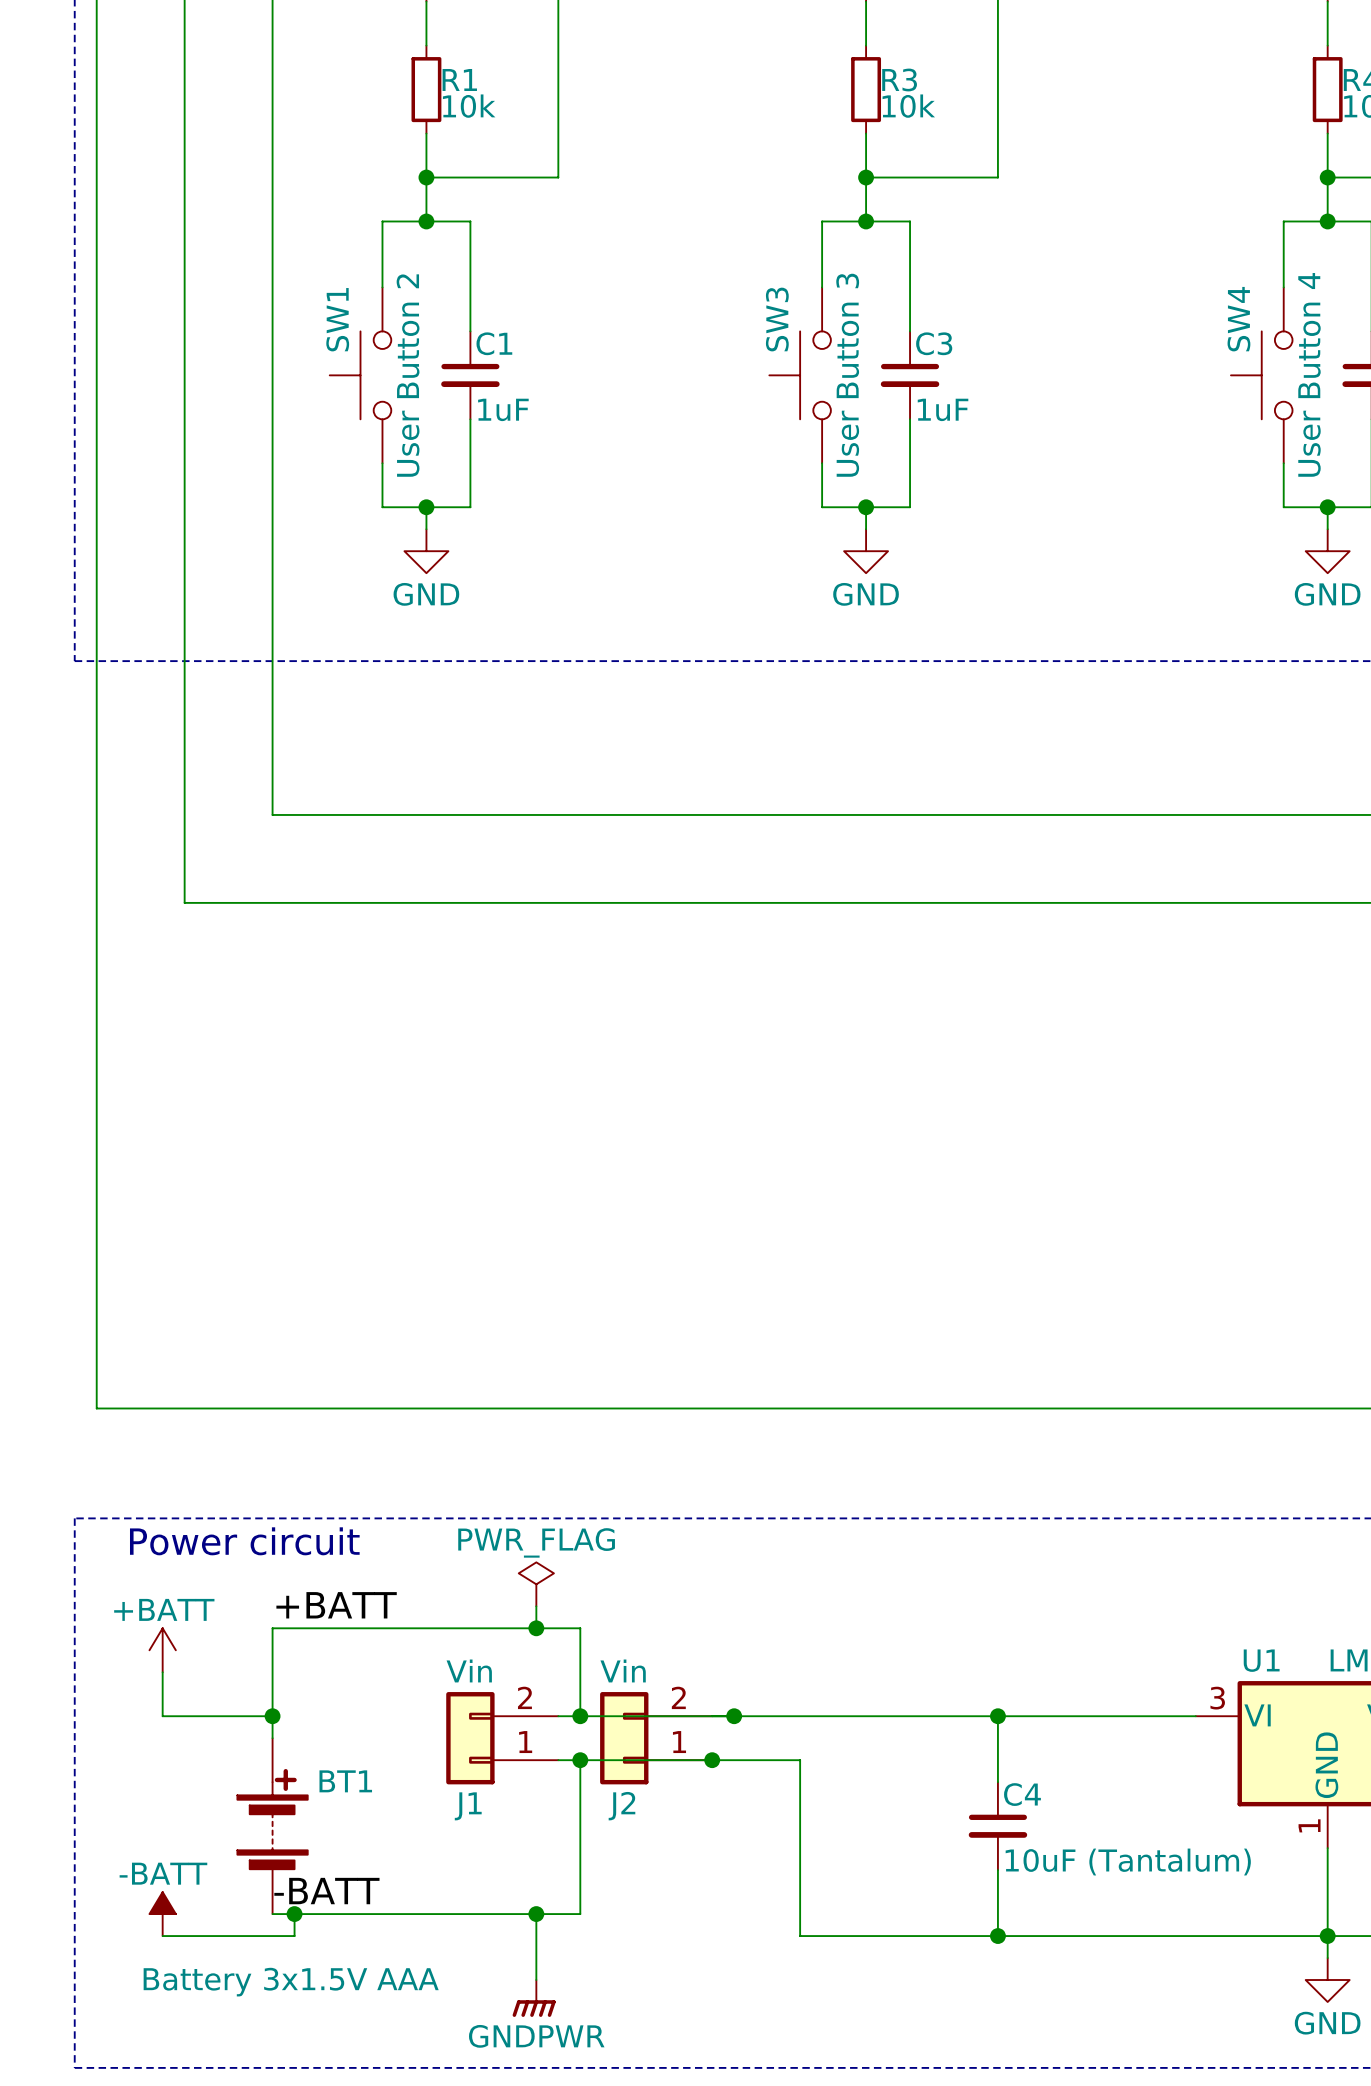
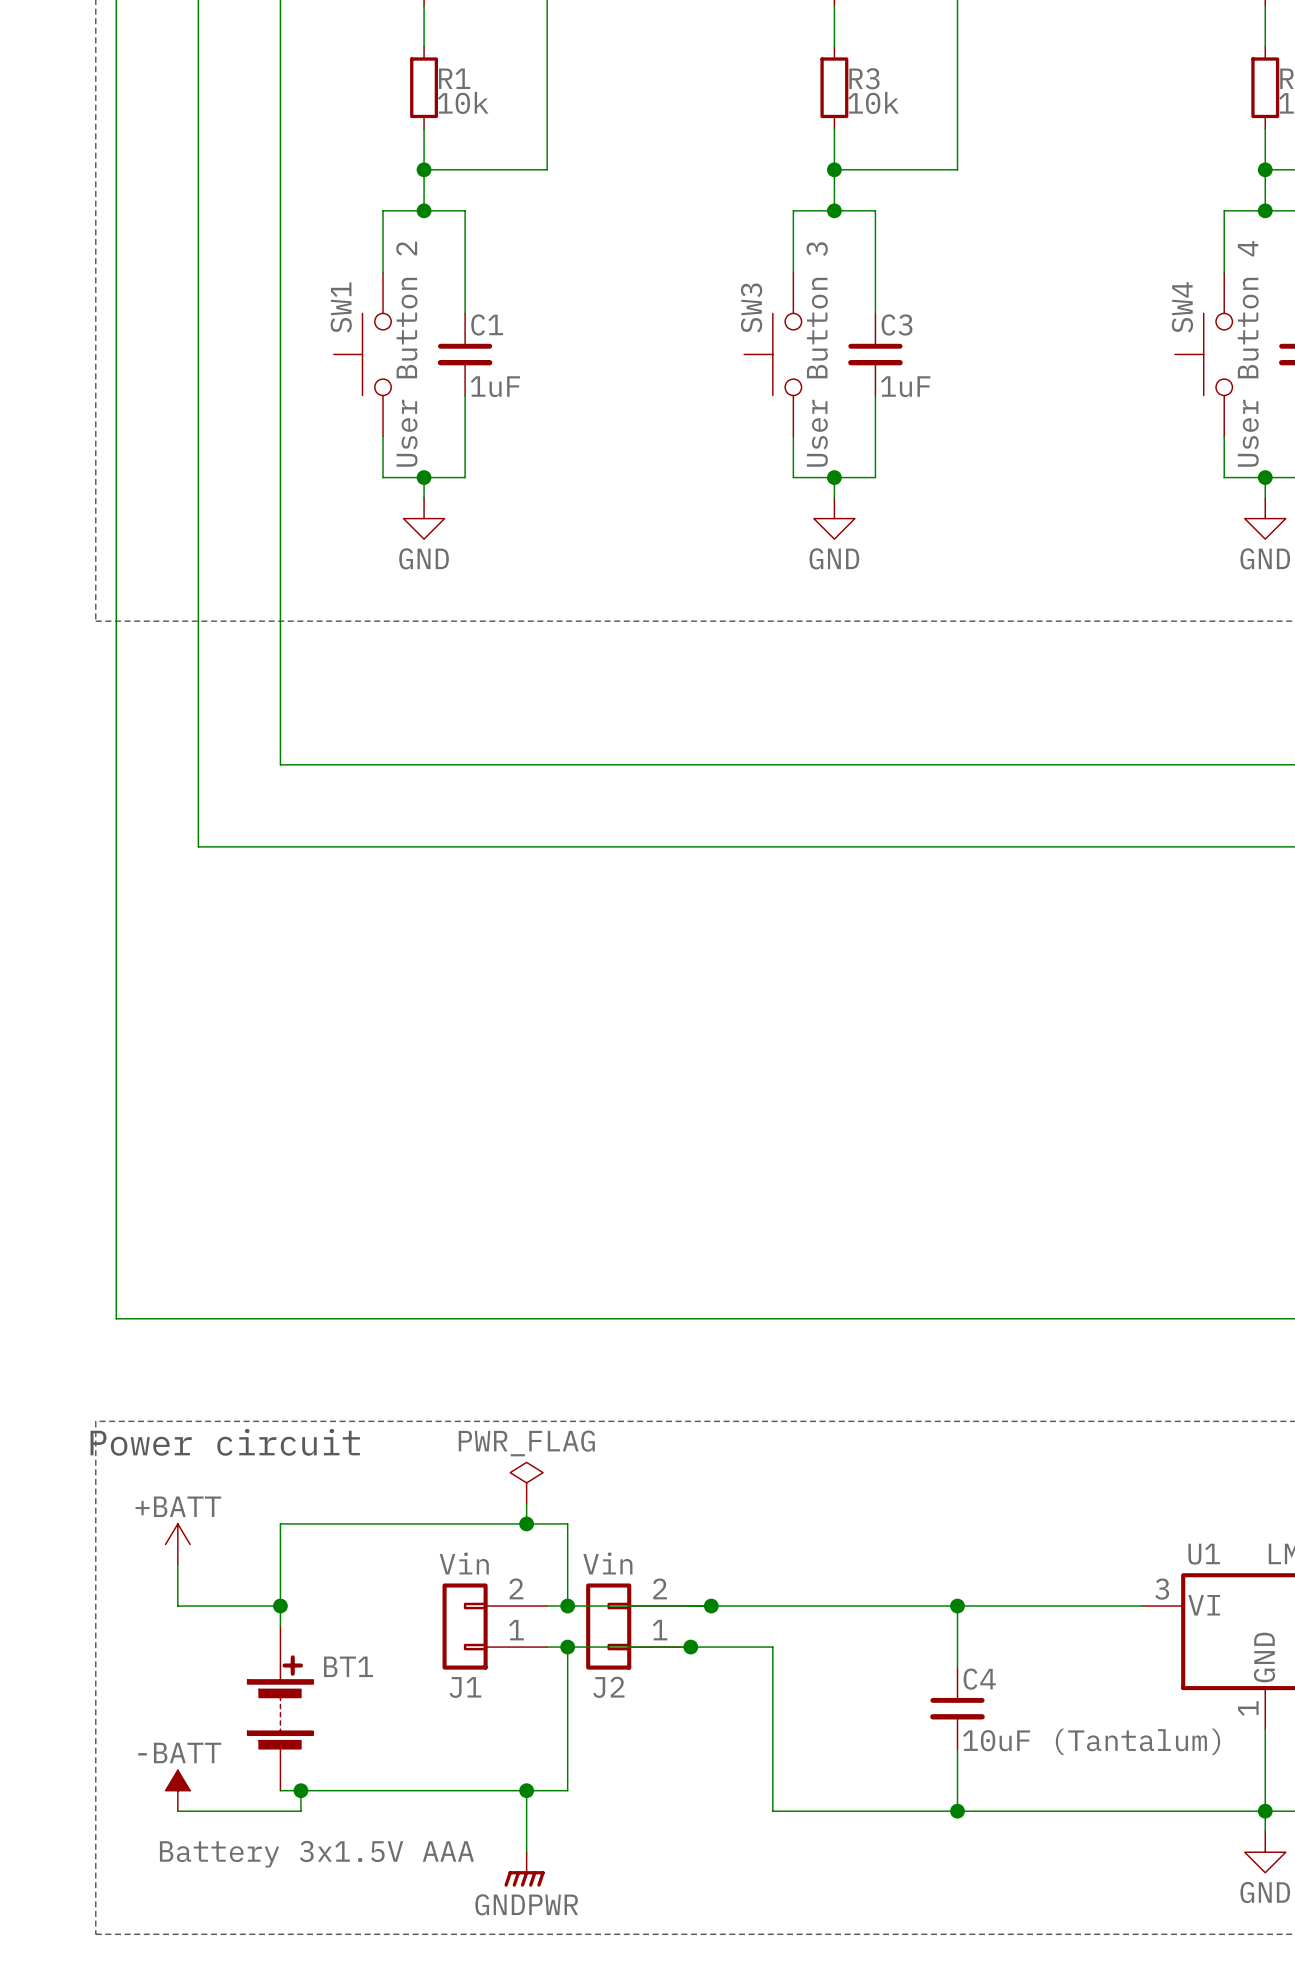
label: +BATT (336, 1605) -> none
label: -BATT (326, 1891) -> none

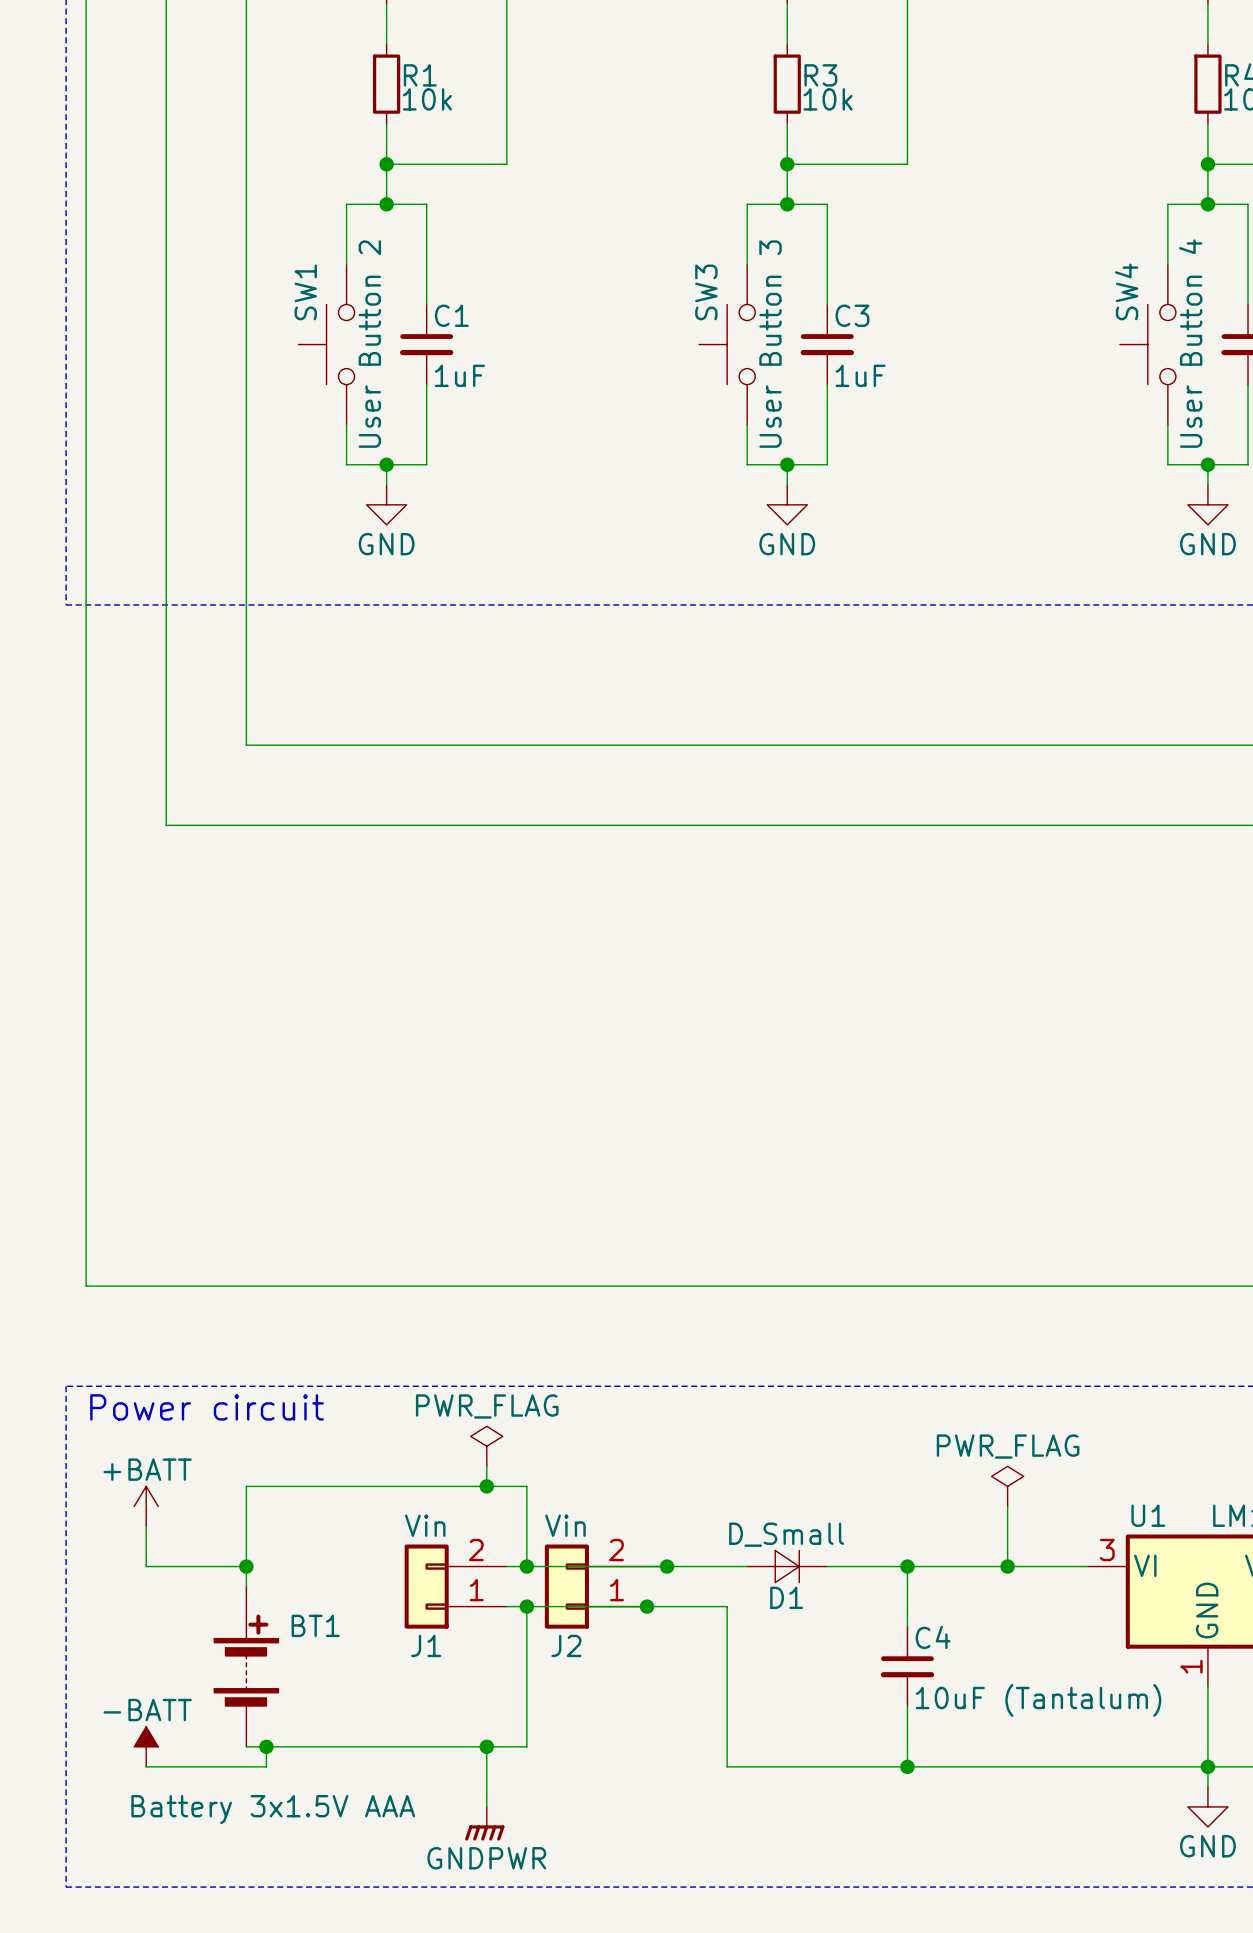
power symbol: none -> PWR_FLAG (1007, 1486)
wire: none -> (1007, 1506) (1007, 1566)
D1: none -> D_Small (787, 1566)
junction: none -> (1007, 1566)

